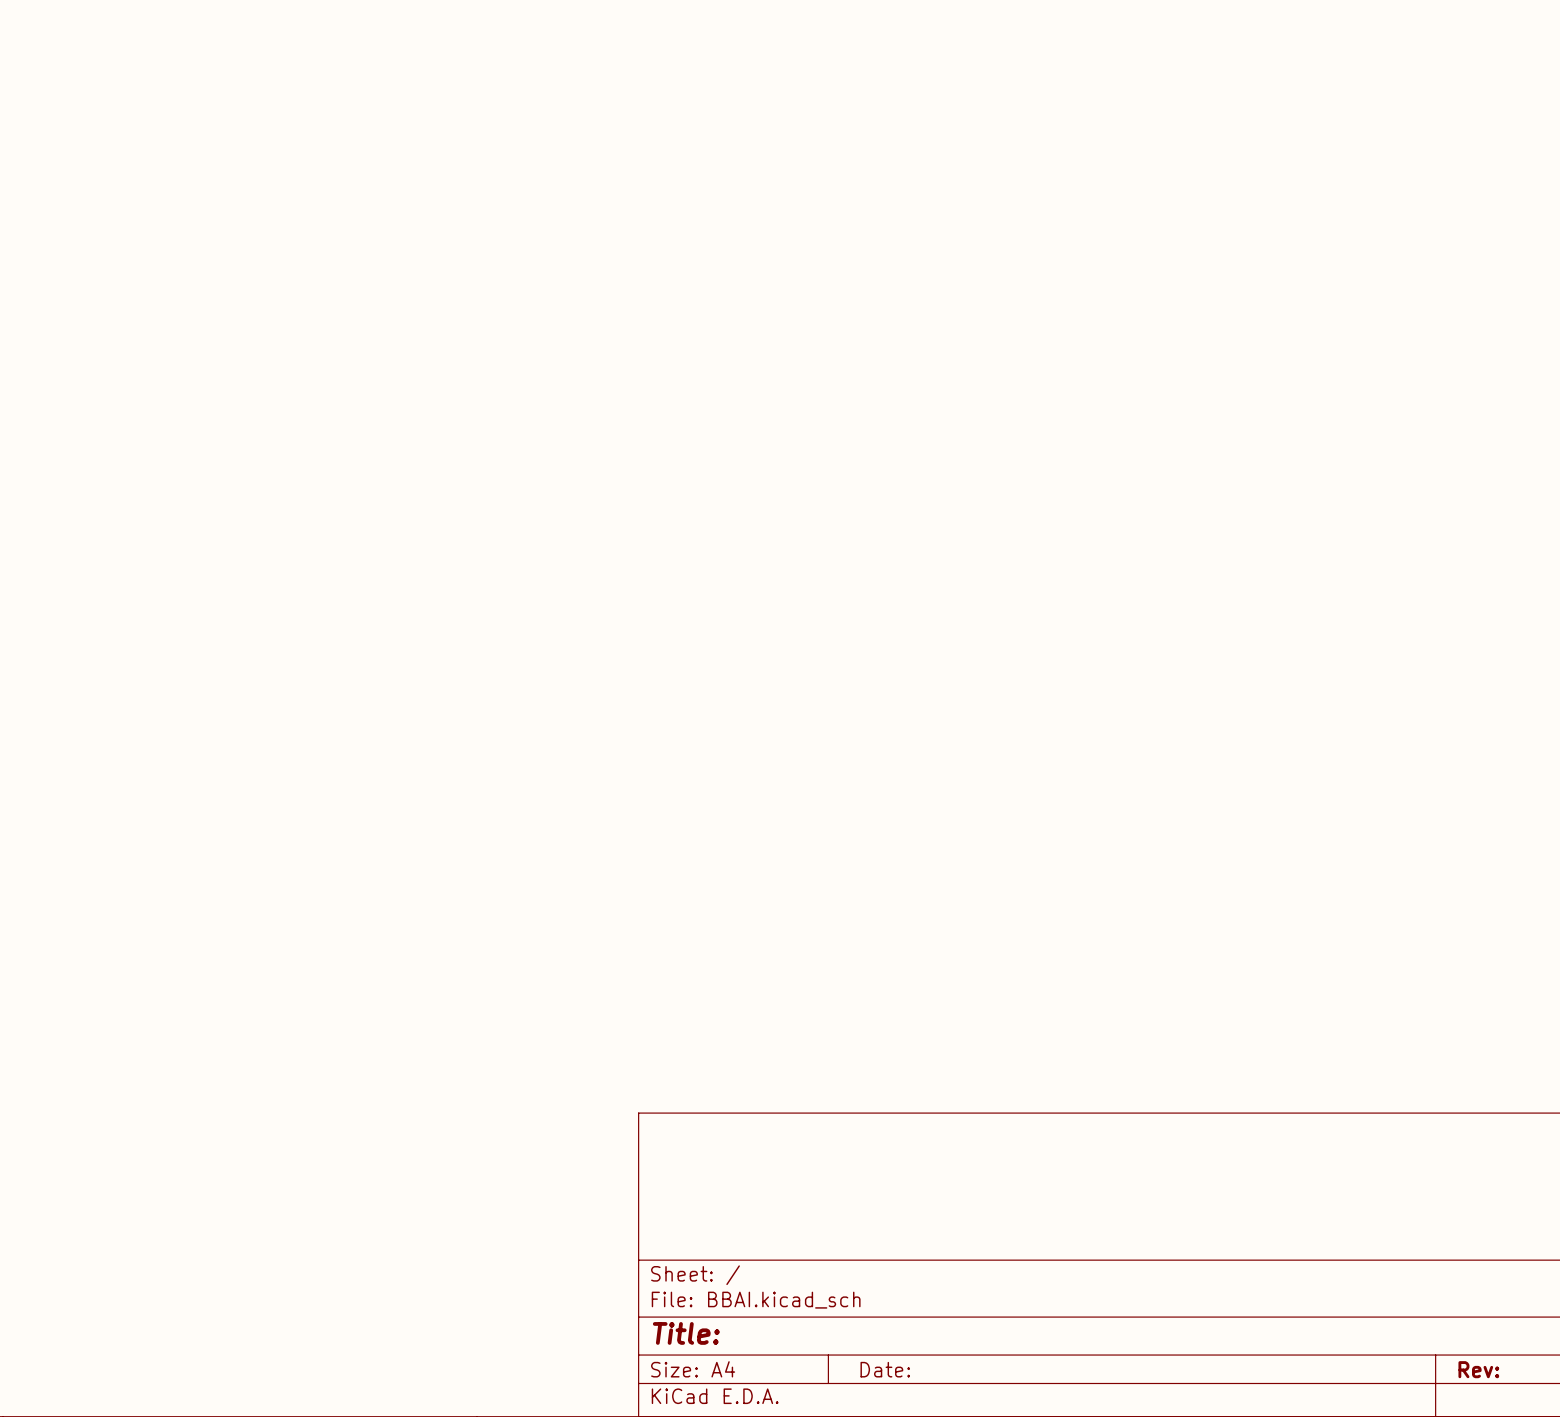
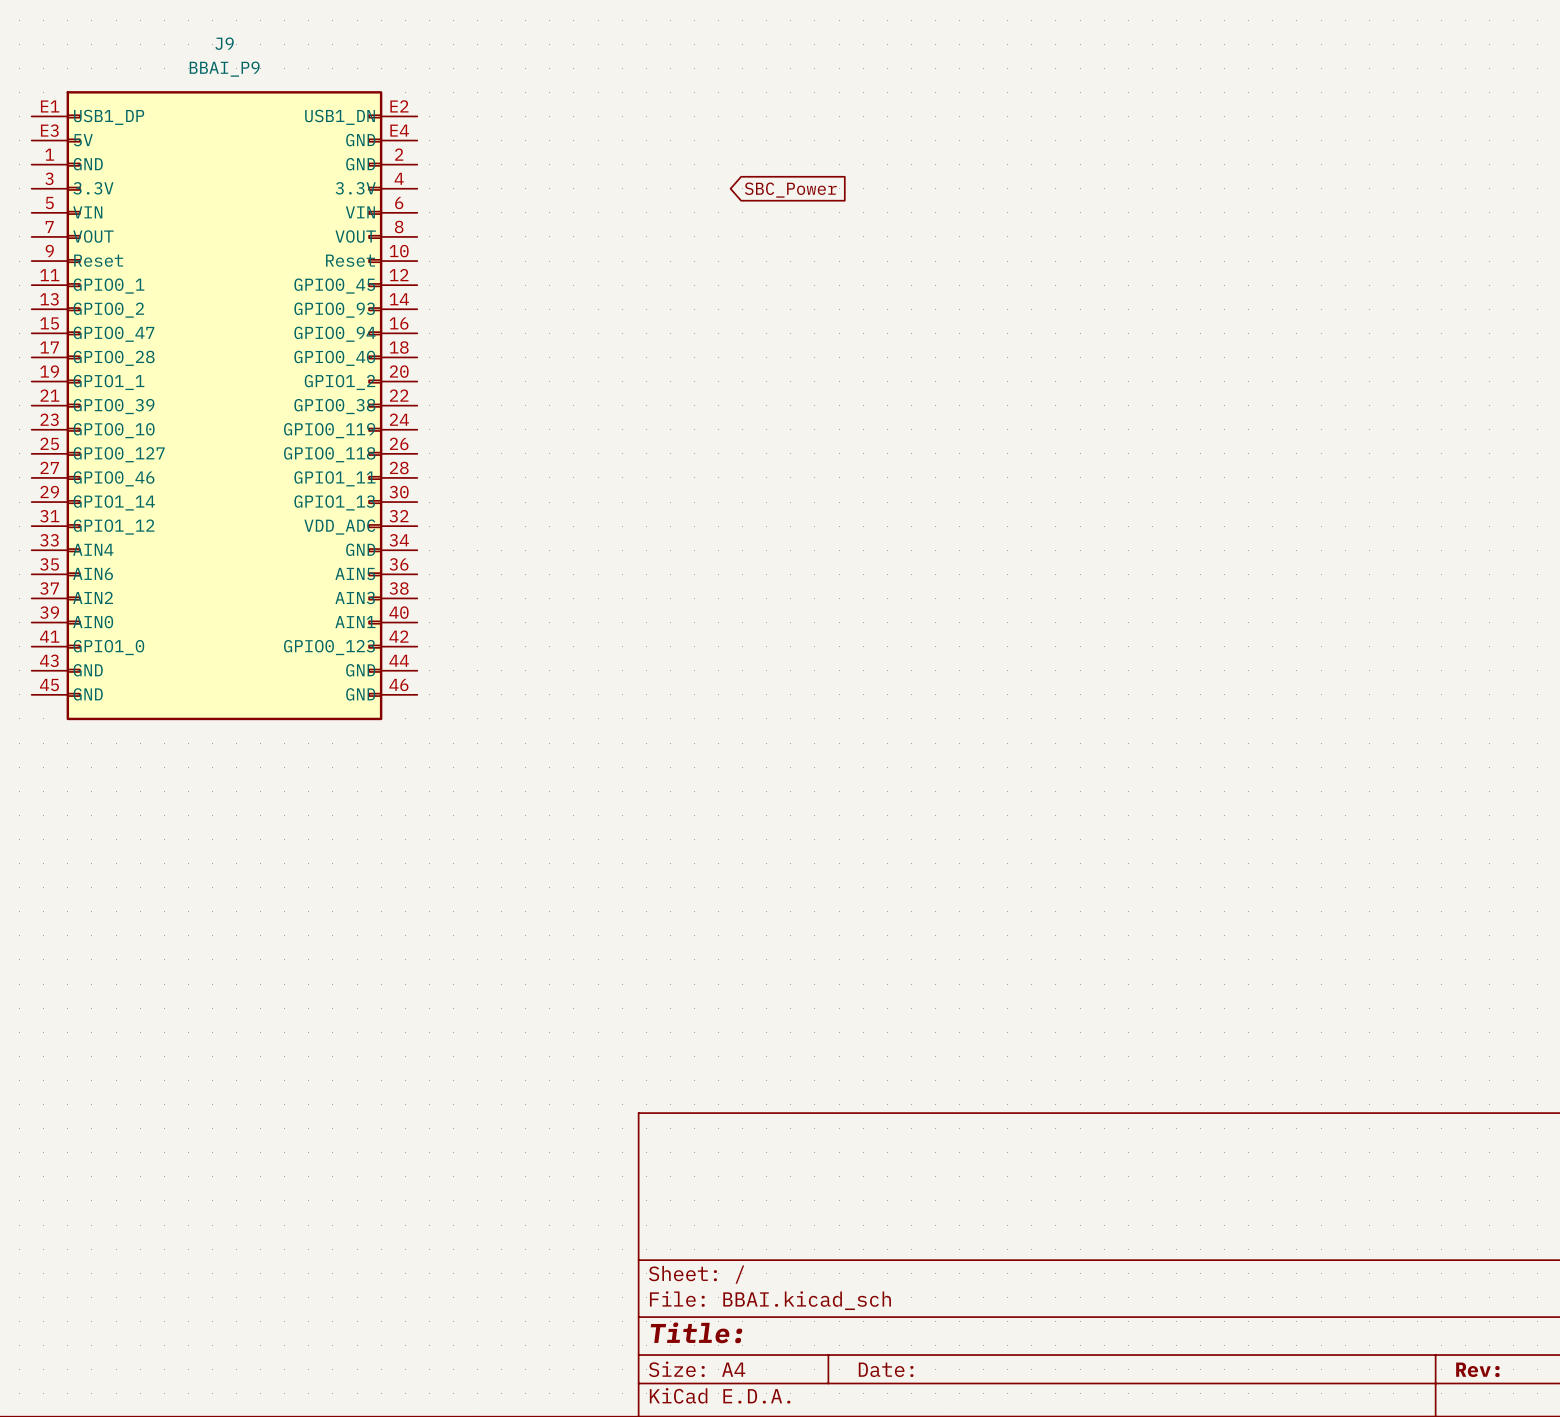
global label: none -> SBC_Power (790, 190)
J9: none -> BBAI_P9 (224, 405)

